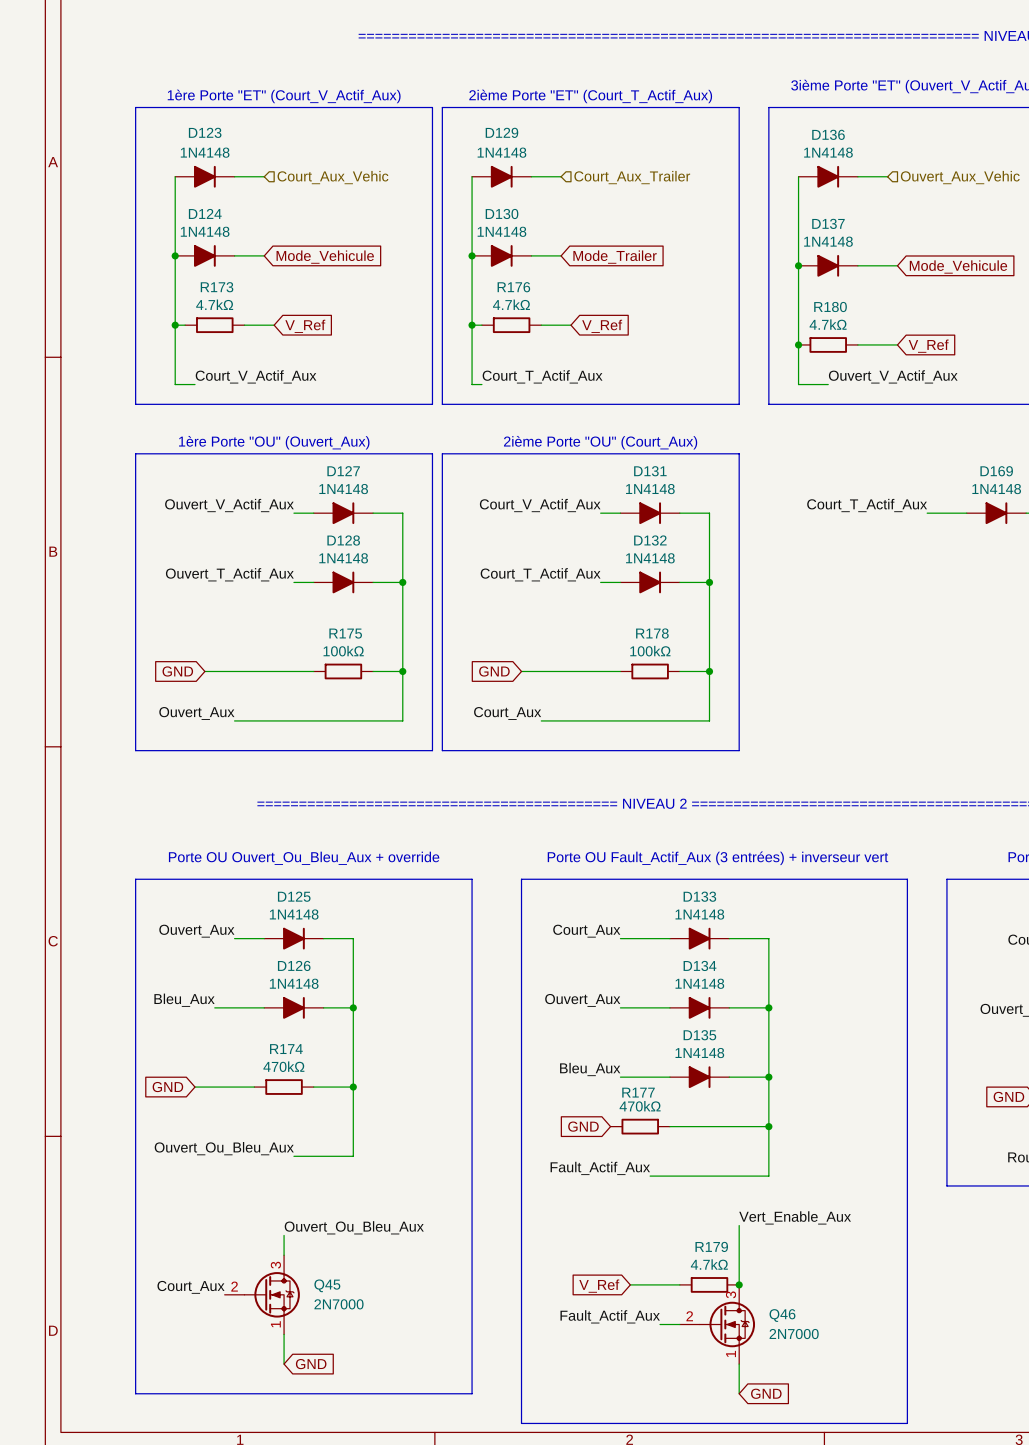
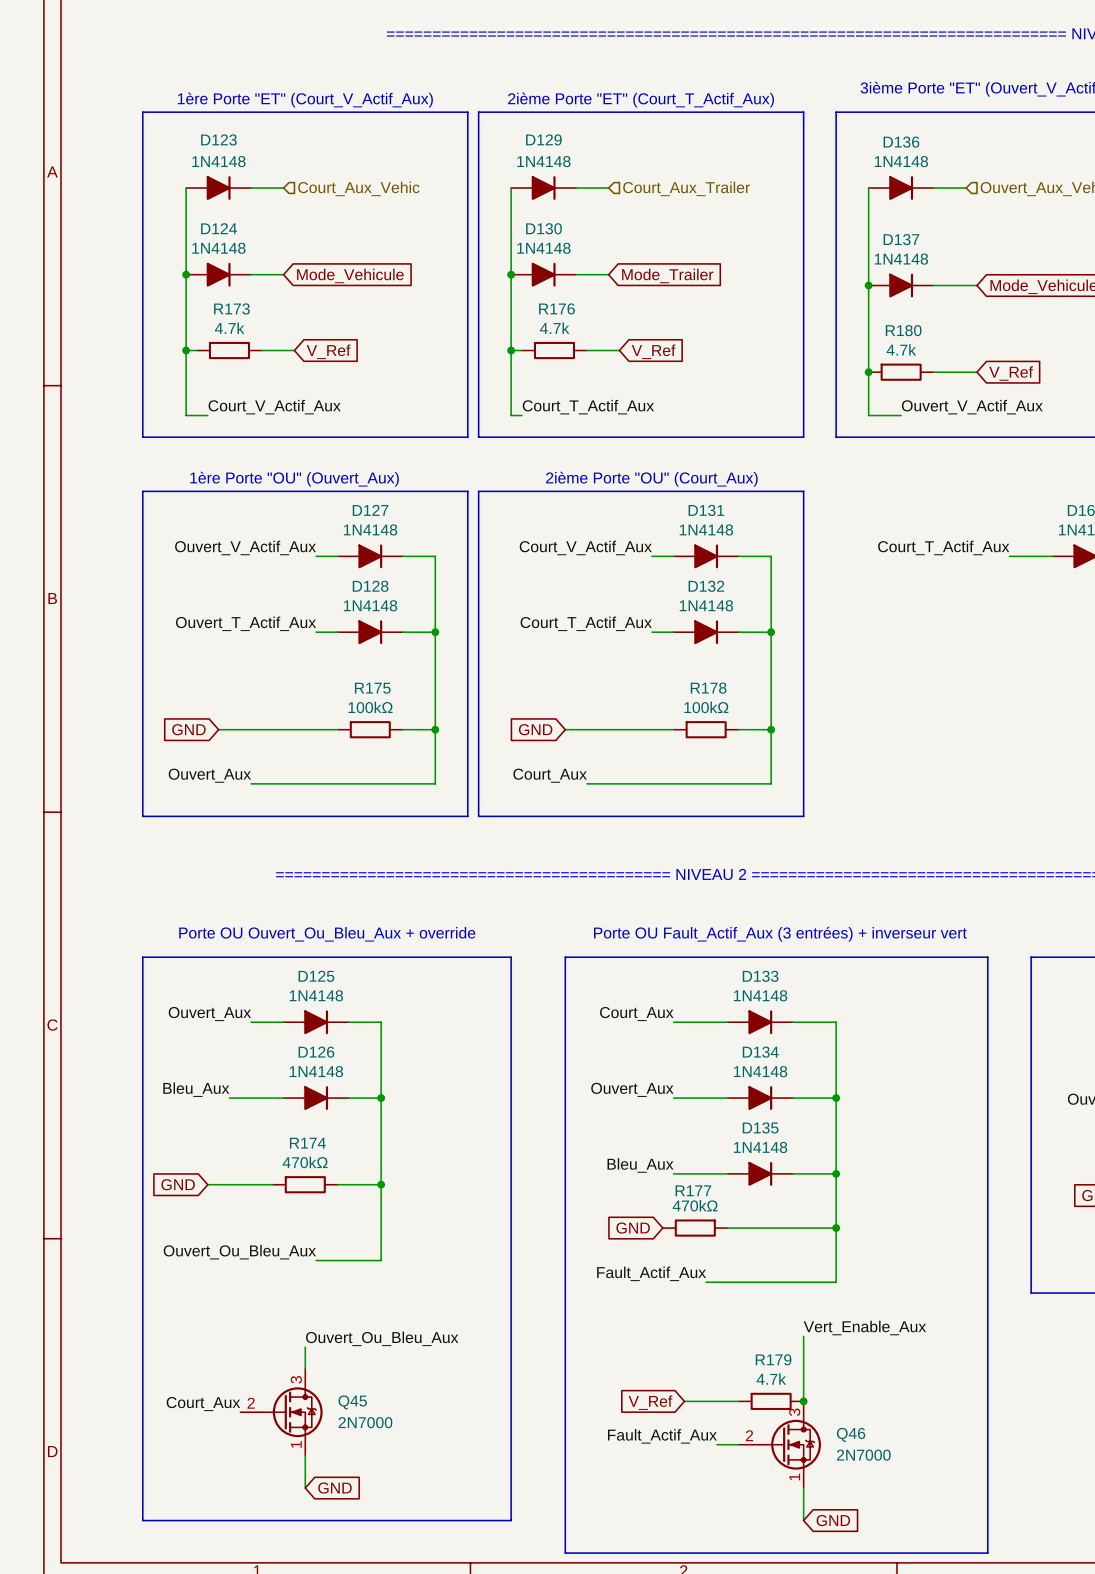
R173 value: 4.7kΩ (214, 304) -> 4.7k (229, 328)
R176 value: 4.7kΩ (511, 304) -> 4.7k (554, 328)
R180 value: 4.7kΩ (828, 324) -> 4.7k (901, 349)
R179 value: 4.7kΩ (709, 1264) -> 4.7k (771, 1379)

